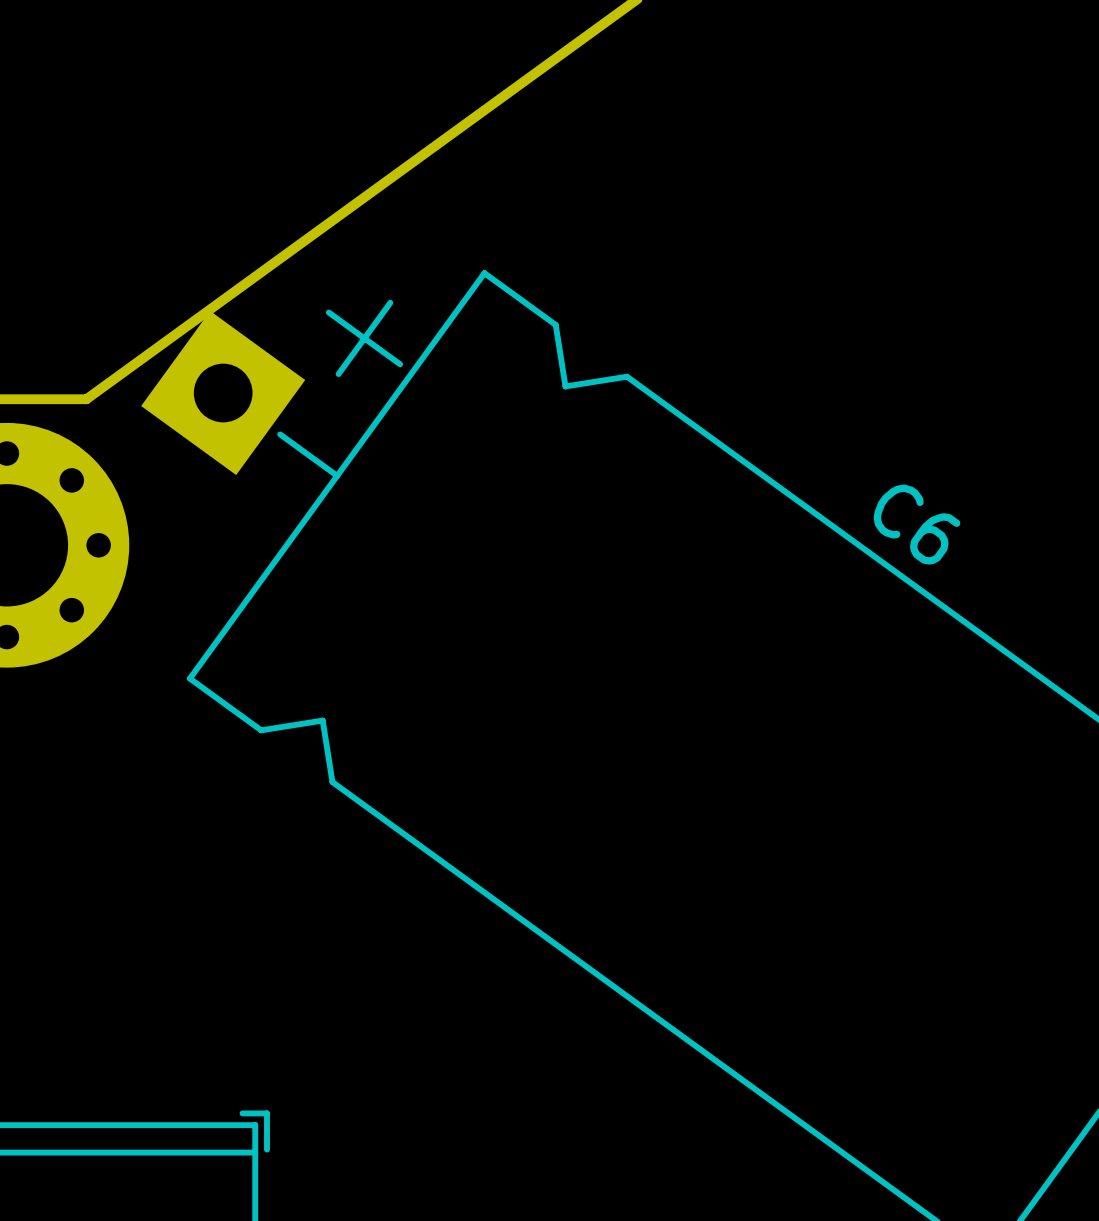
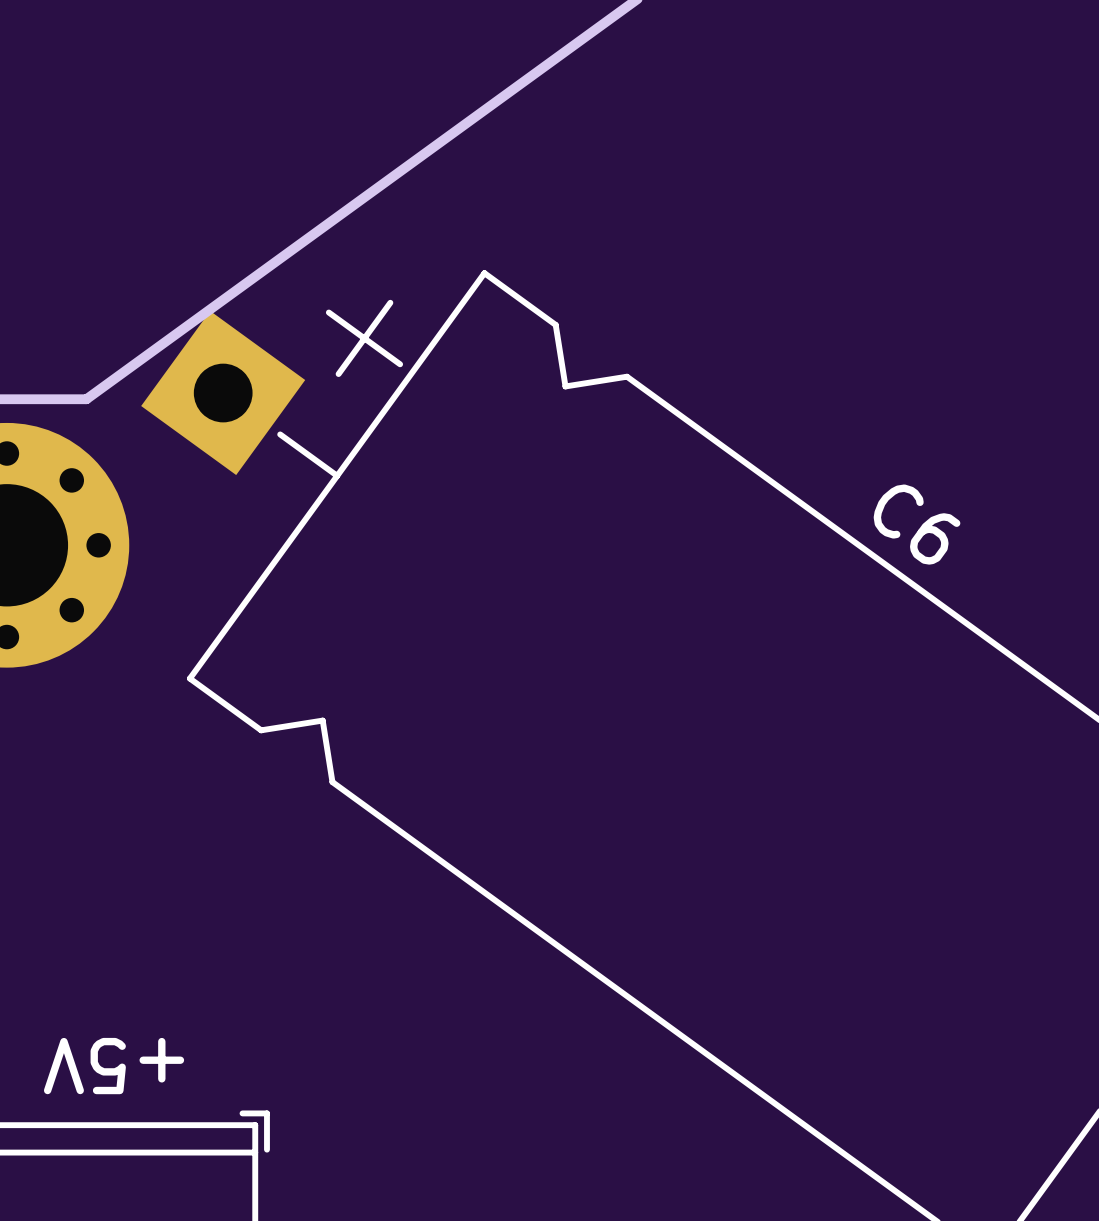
text: none -> +5V (114, 1066)

